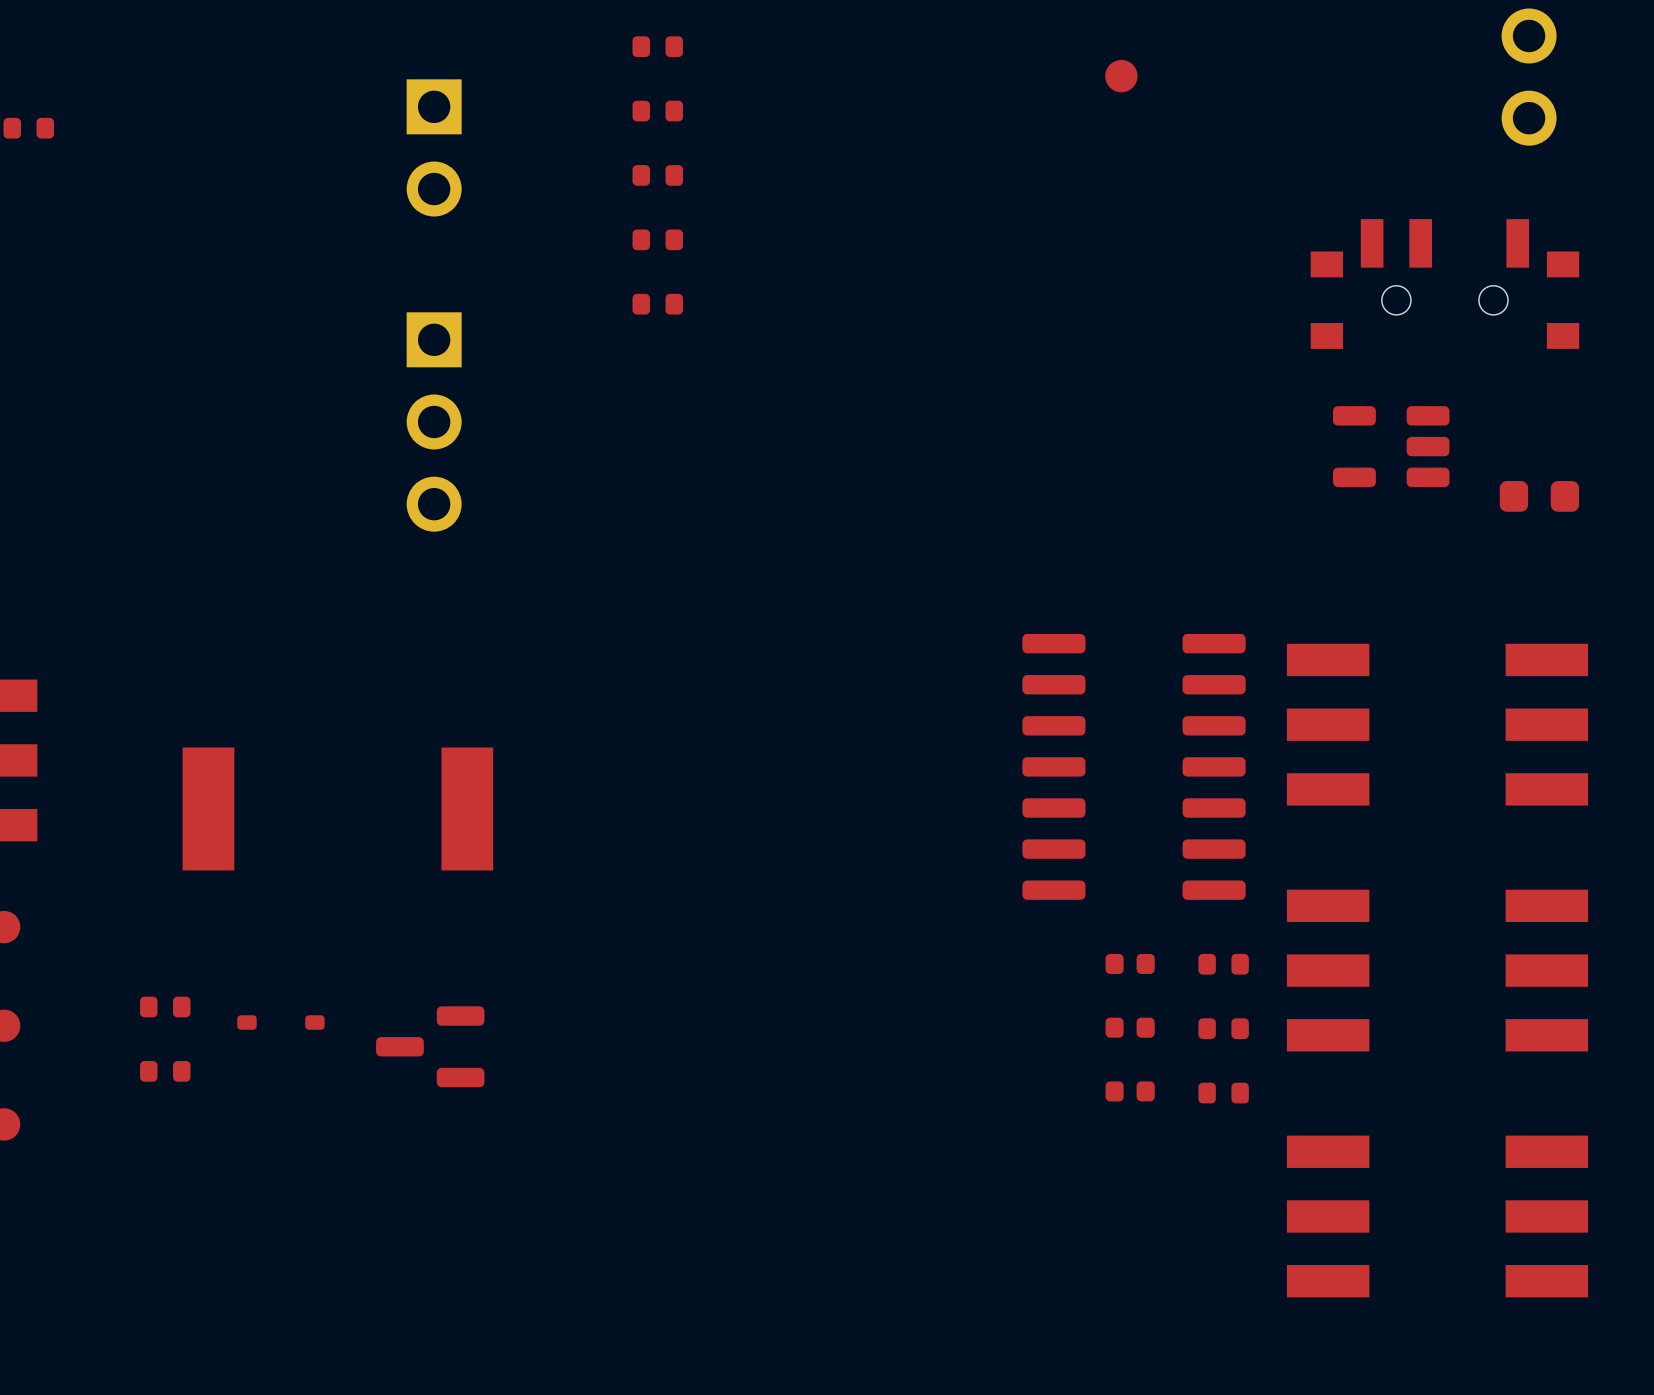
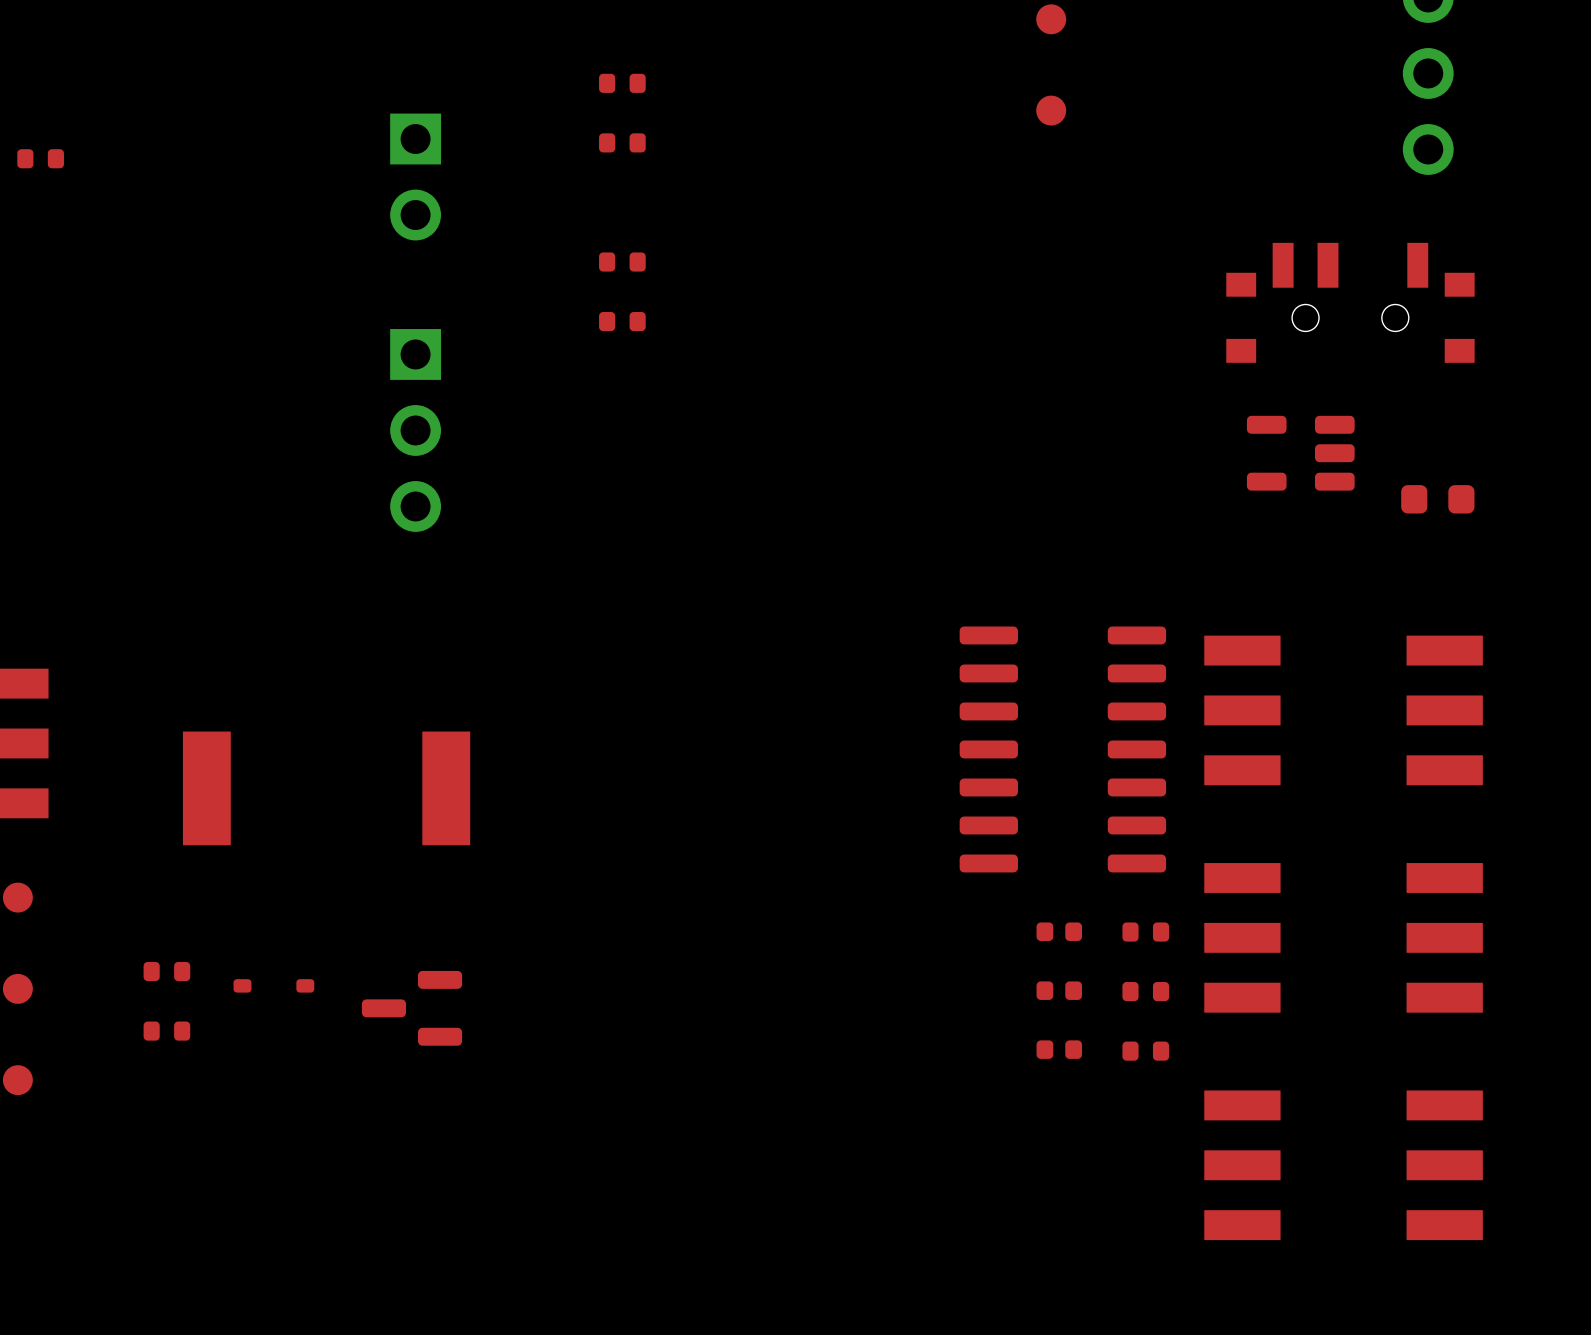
part: (657, 175) -> none

